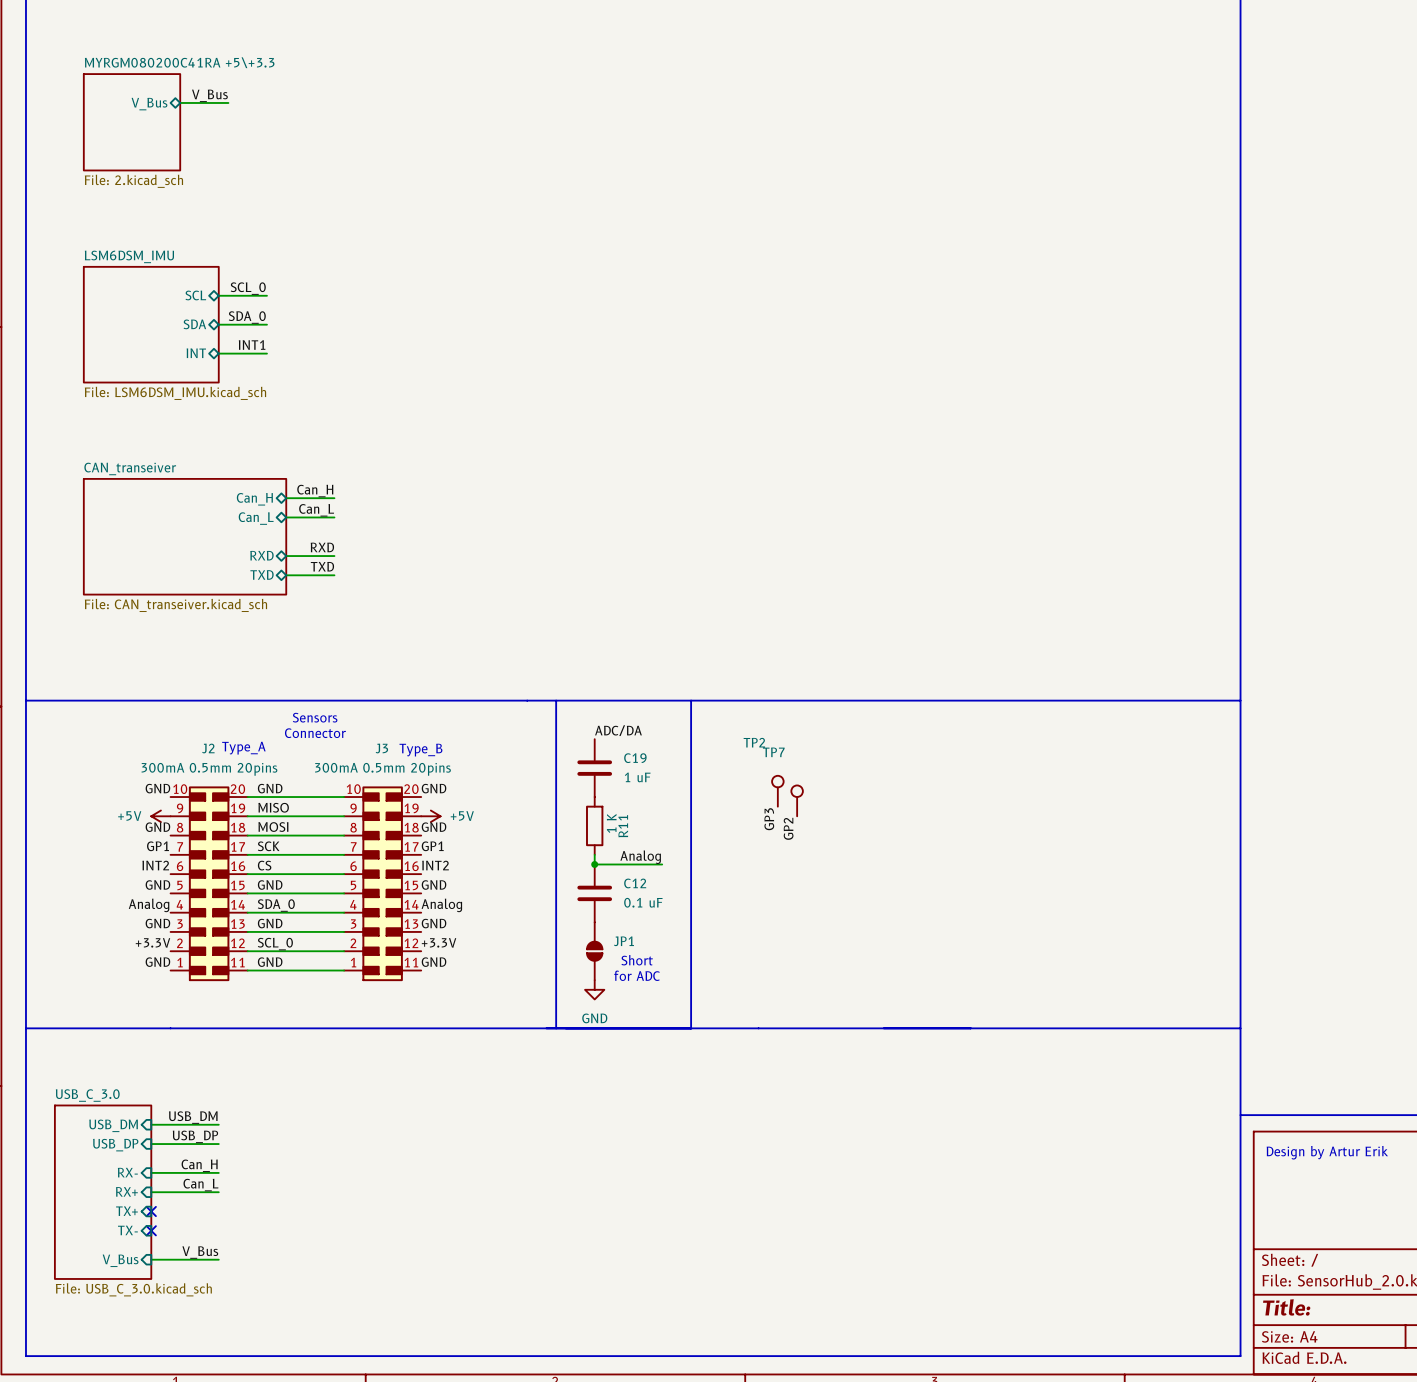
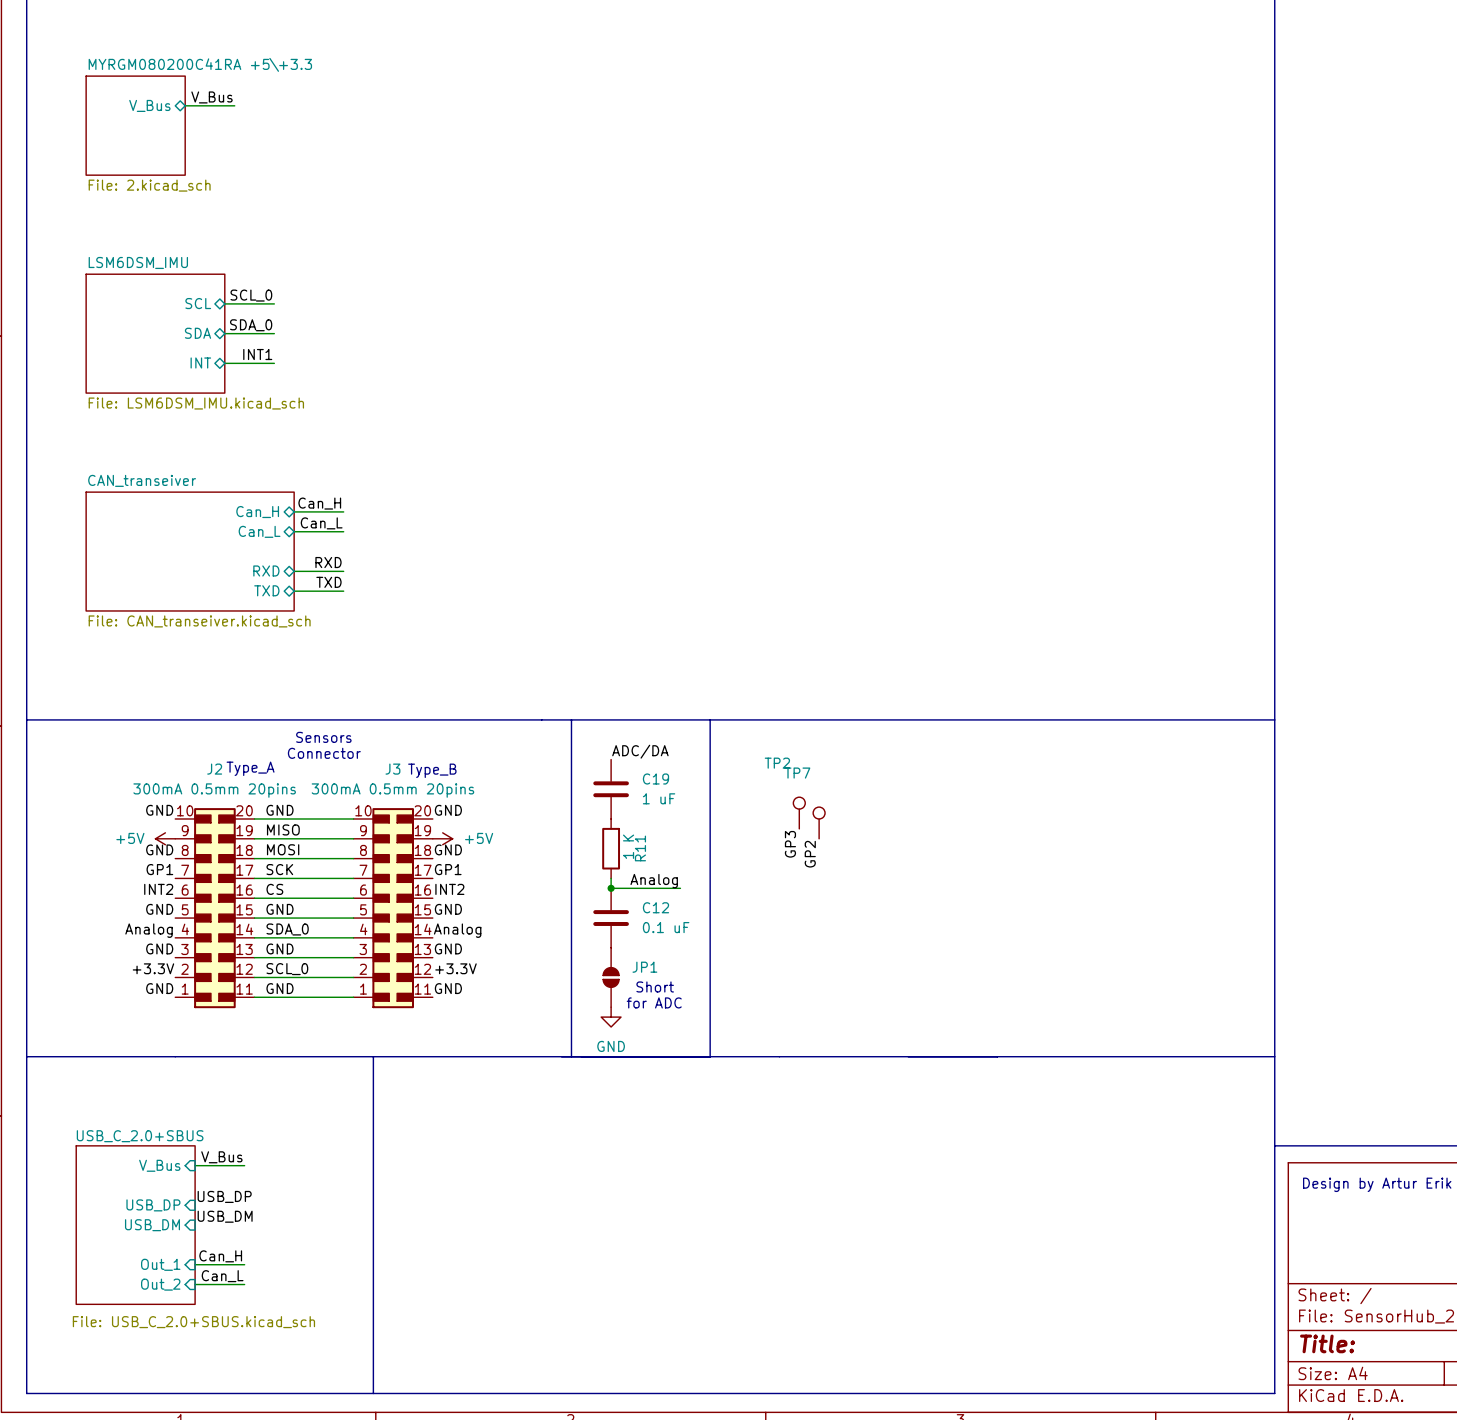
line: none -> (373, 1056) (373, 1393)
label position: USB_DM (193, 1117) -> USB_DM (225, 1216)
wire: (151, 1124) (218, 1124) -> none
sheet pin position: USB_DM (113, 1125) -> USB_DM (152, 1225)
wire: none -> (195, 1165) (244, 1165)
label position: USB_DP (195, 1136) -> USB_DP (224, 1196)
wire: (151, 1144) (218, 1144) -> none
sheet pin position: USB_DP (115, 1145) -> USB_DP (153, 1205)
label position: Can_H (199, 1165) -> Can_H (220, 1256)
sheet pin: RX- (127, 1172) -> none
wire: (151, 1172) (218, 1172) -> none
label position: Can_L (200, 1185) -> Can_L (222, 1276)
sheet pin: RX+ (126, 1191) -> none
sheet USB_C_3.0: File: USB_C_3.0.kicad_sch (103, 1192) -> none
sheet USB_C_2.0+SBUS: none -> File: USB_C_2.0+SBUS.kicad_sch (135, 1225)
wire: (151, 1192) (218, 1192) -> none
sheet pin: TX+ (126, 1211) -> none
no-connect mark: (151, 1211) -> none
sheet pin: TX- (127, 1230) -> none
no-connect mark: (151, 1230) -> none
wire: none -> (195, 1264) (244, 1264)
sheet pin: none -> Out_1 (160, 1264)
wire: none -> (195, 1284) (244, 1284)
sheet pin: none -> Out_2 (160, 1284)
label position: V_Bus (200, 1252) -> V_Bus (221, 1157)
wire: (151, 1259) (218, 1259) -> none
sheet pin position: V_Bus (120, 1260) -> V_Bus (159, 1165)

